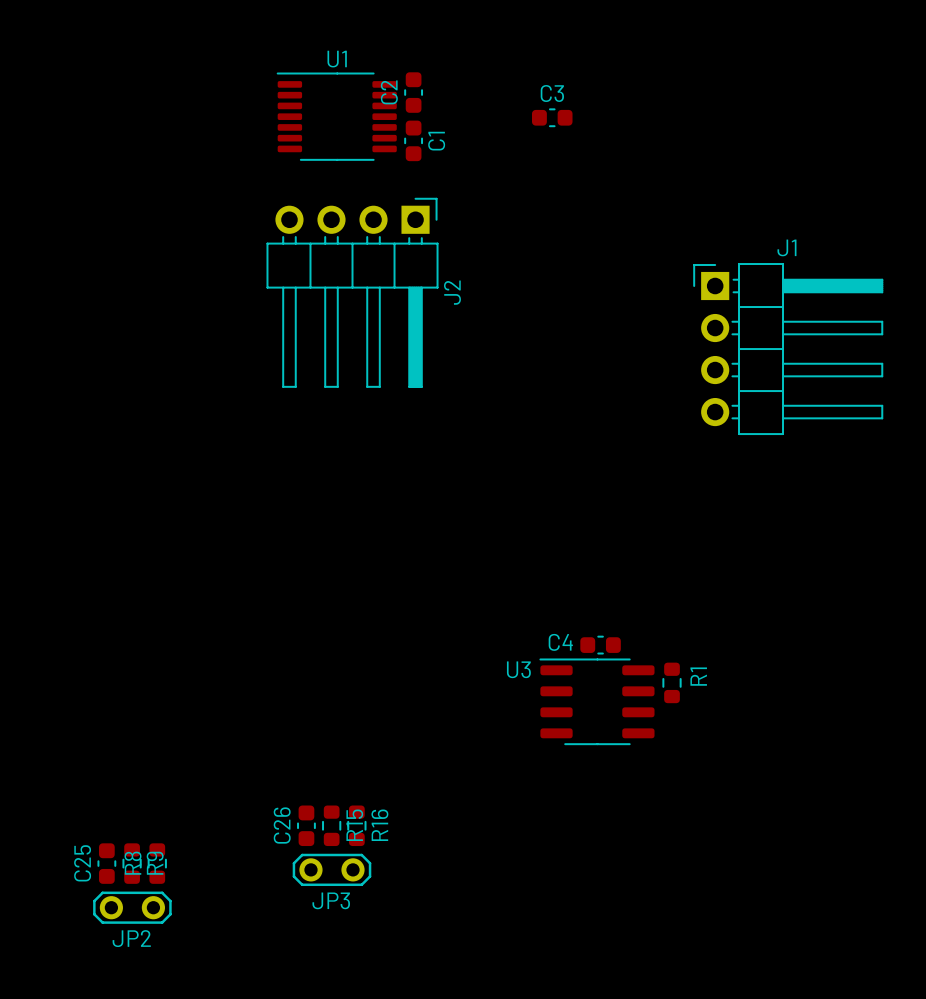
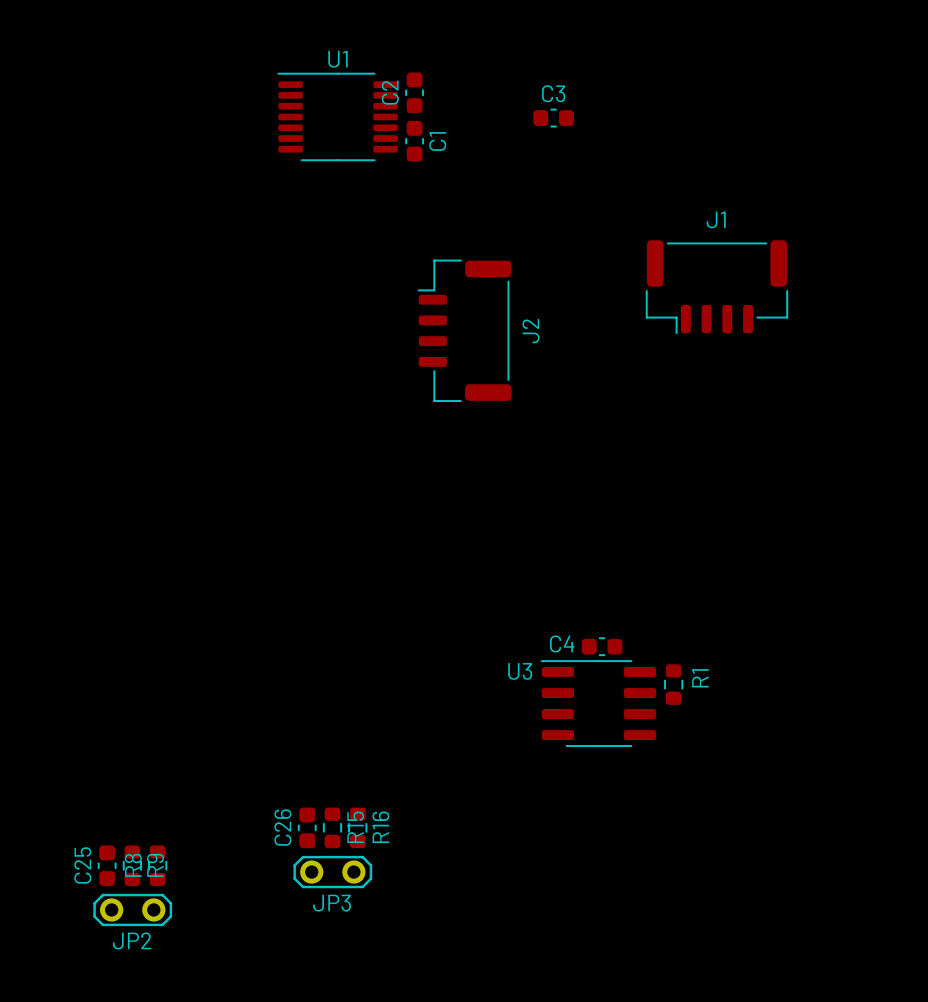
J2 footprint: [266, 197, 439, 388] -> [417, 259, 512, 403]
J1 name position: J1 (786, 247) -> J1 (716, 219)
J1 footprint: [693, 263, 884, 436] -> [645, 240, 789, 335]
J2 name position: J2 (452, 292) -> J2 (530, 331)

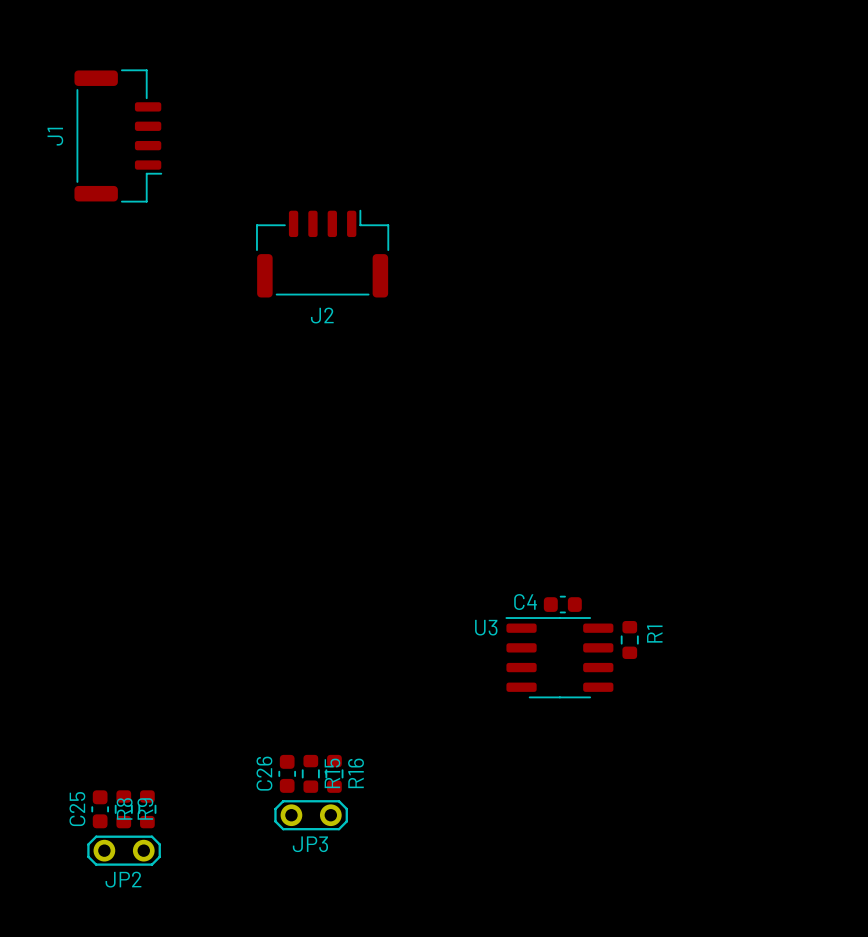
C2: (414, 92) -> none
U1: (337, 116) -> none
C3: (553, 118) -> none
C1: (414, 141) -> none
J1 rotation: 0° (716, 287) -> 90° counterclockwise (118, 135)
J1 position: (716, 287) -> (118, 135)
J2 rotation: 0° (464, 330) -> 90° clockwise (322, 253)
J2 position: (464, 330) -> (322, 253)

